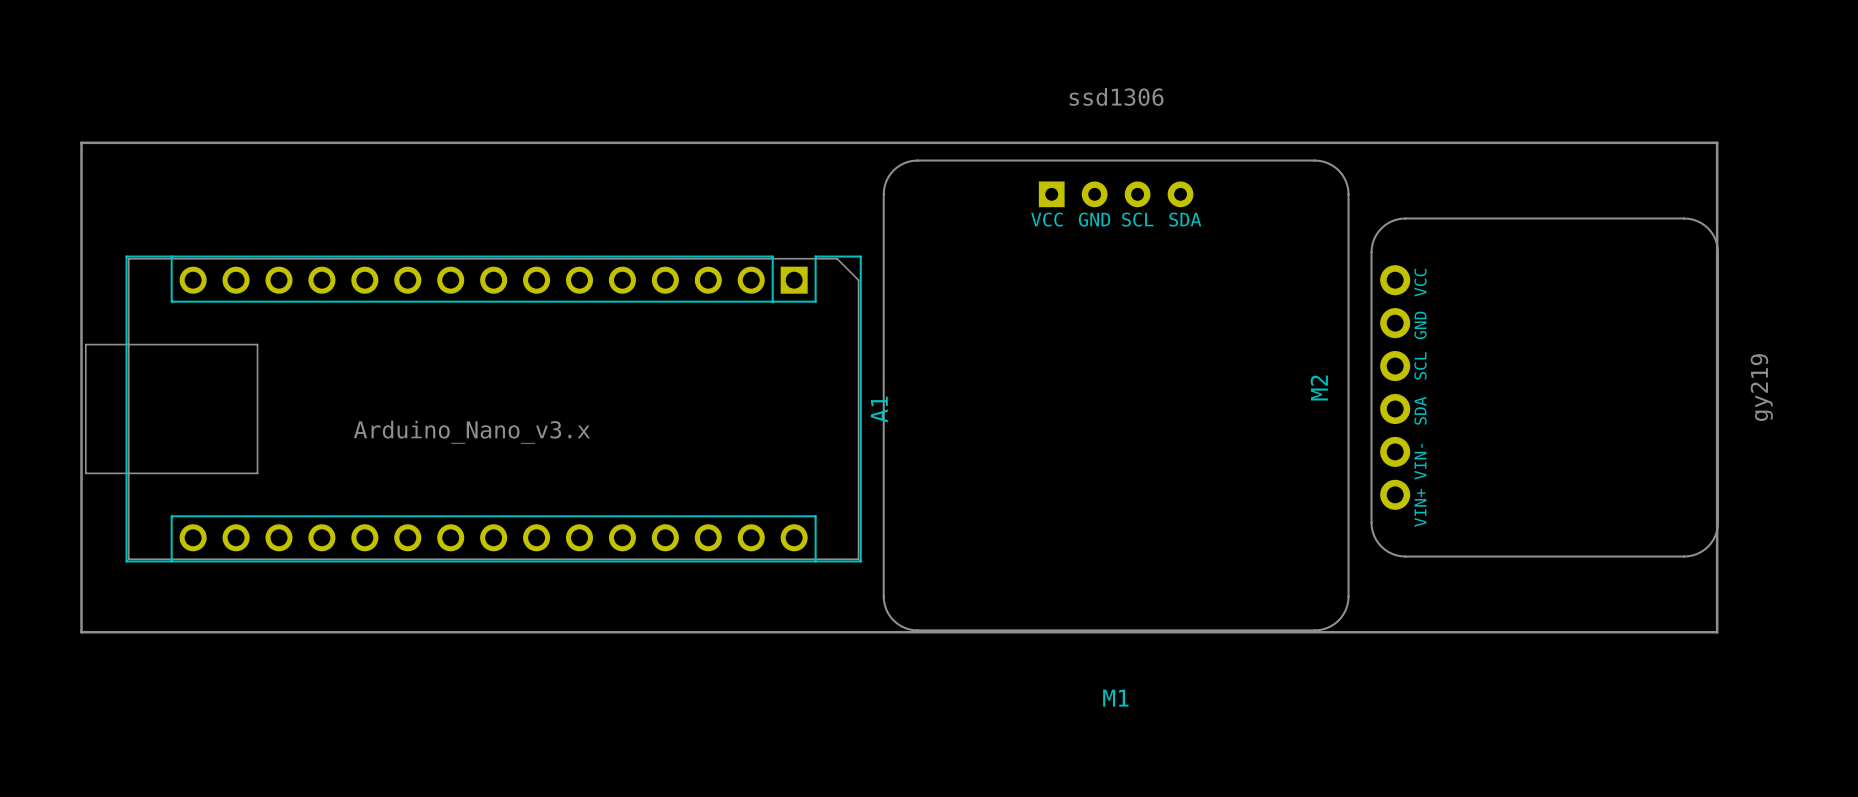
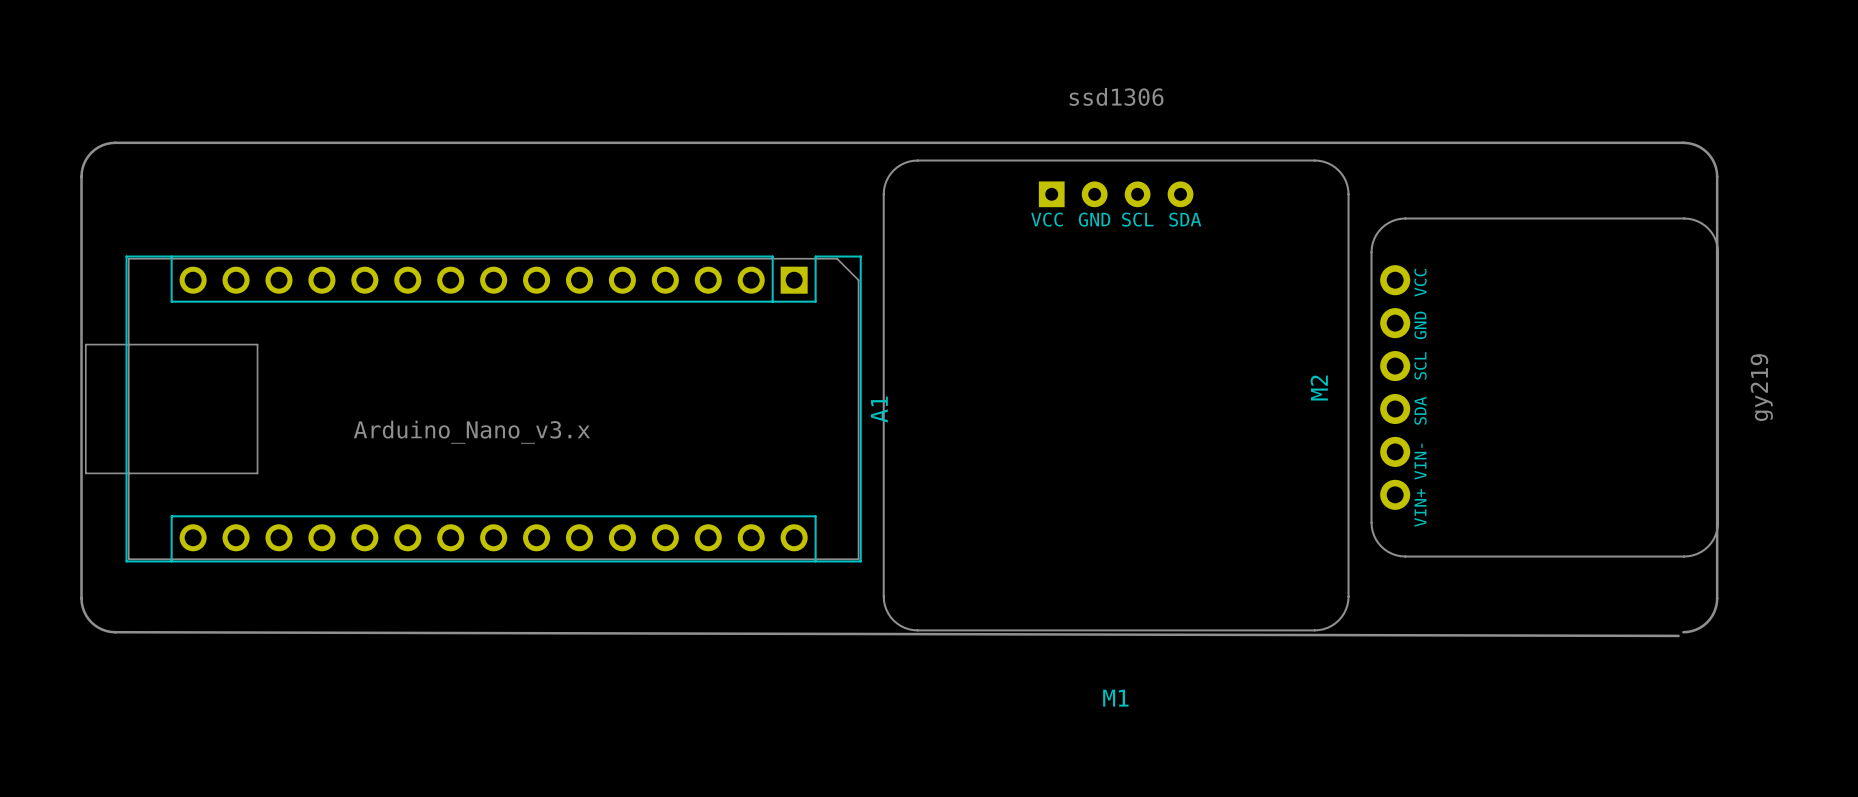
line: (115, 142) (81, 142) (81, 176) -> (115, 142) (102, 145) (91, 152) (84, 163) (81, 176)
line: (1683, 142) (1717, 142) (1717, 176) -> (1683, 142) (1696, 145) (1707, 152) (1714, 163) (1717, 176)
line: (81, 598) (81, 632) (1717, 632) (1717, 598) -> (81, 598) (84, 611) (91, 622) (102, 629) (115, 632) (1678, 635)
line: none -> (1717, 598) (1714, 611) (1707, 622) (1696, 629) (1683, 632)

